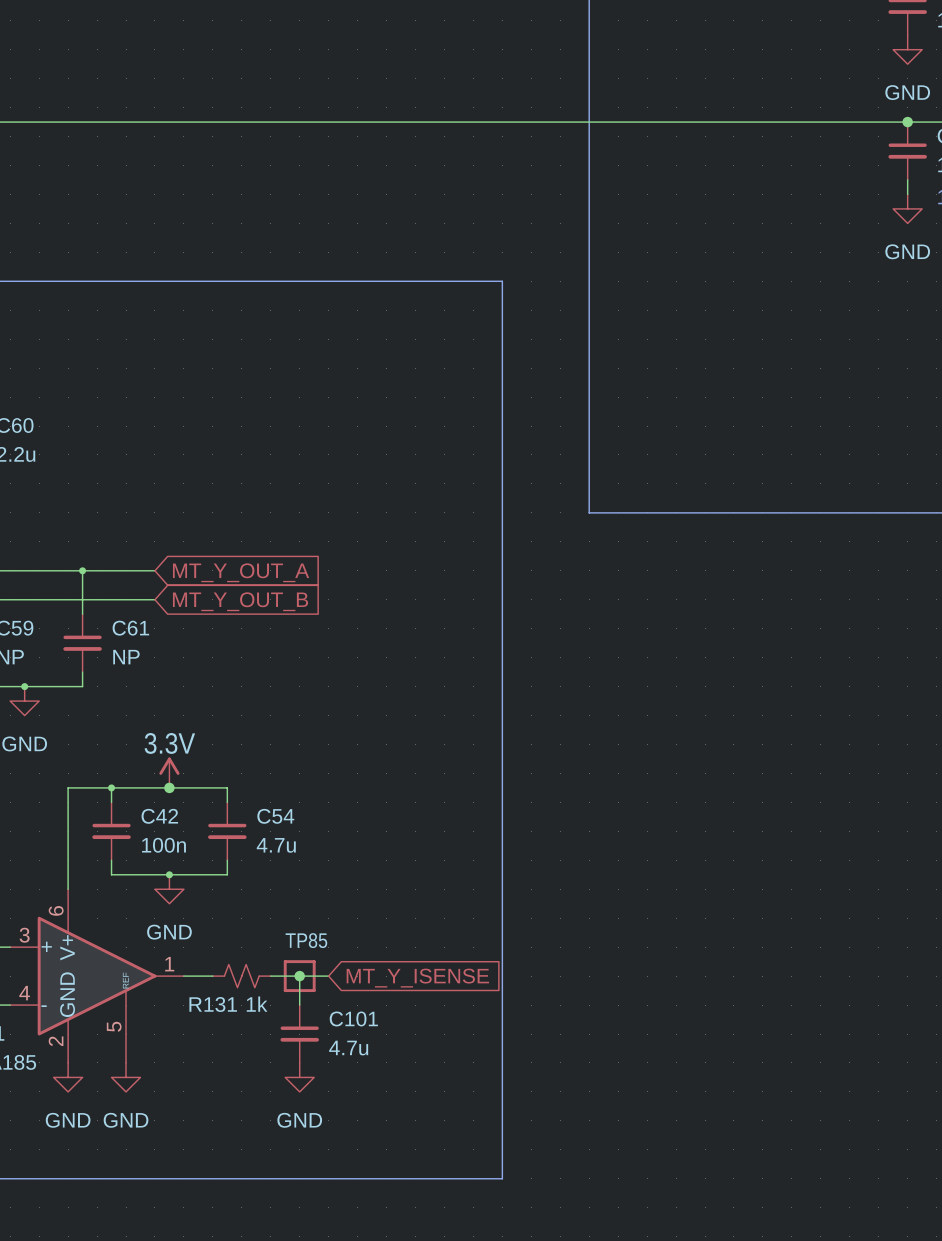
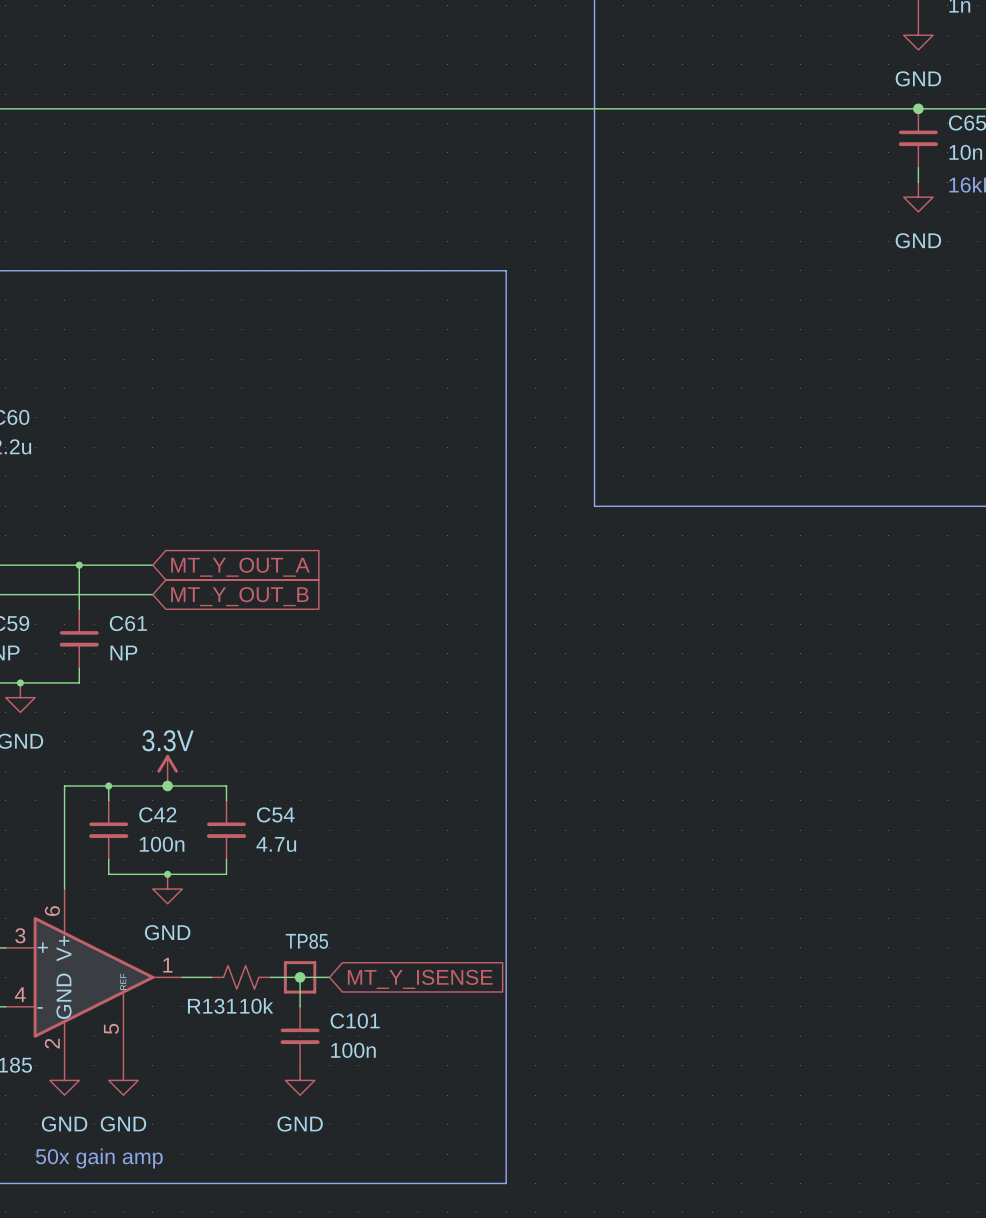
R131 value: 1k (257, 1004) -> 10k (256, 1005)
C101 value: 4.7u (348, 1048) -> 100n (353, 1050)
text: none -> 50x gain amp (99, 1158)

